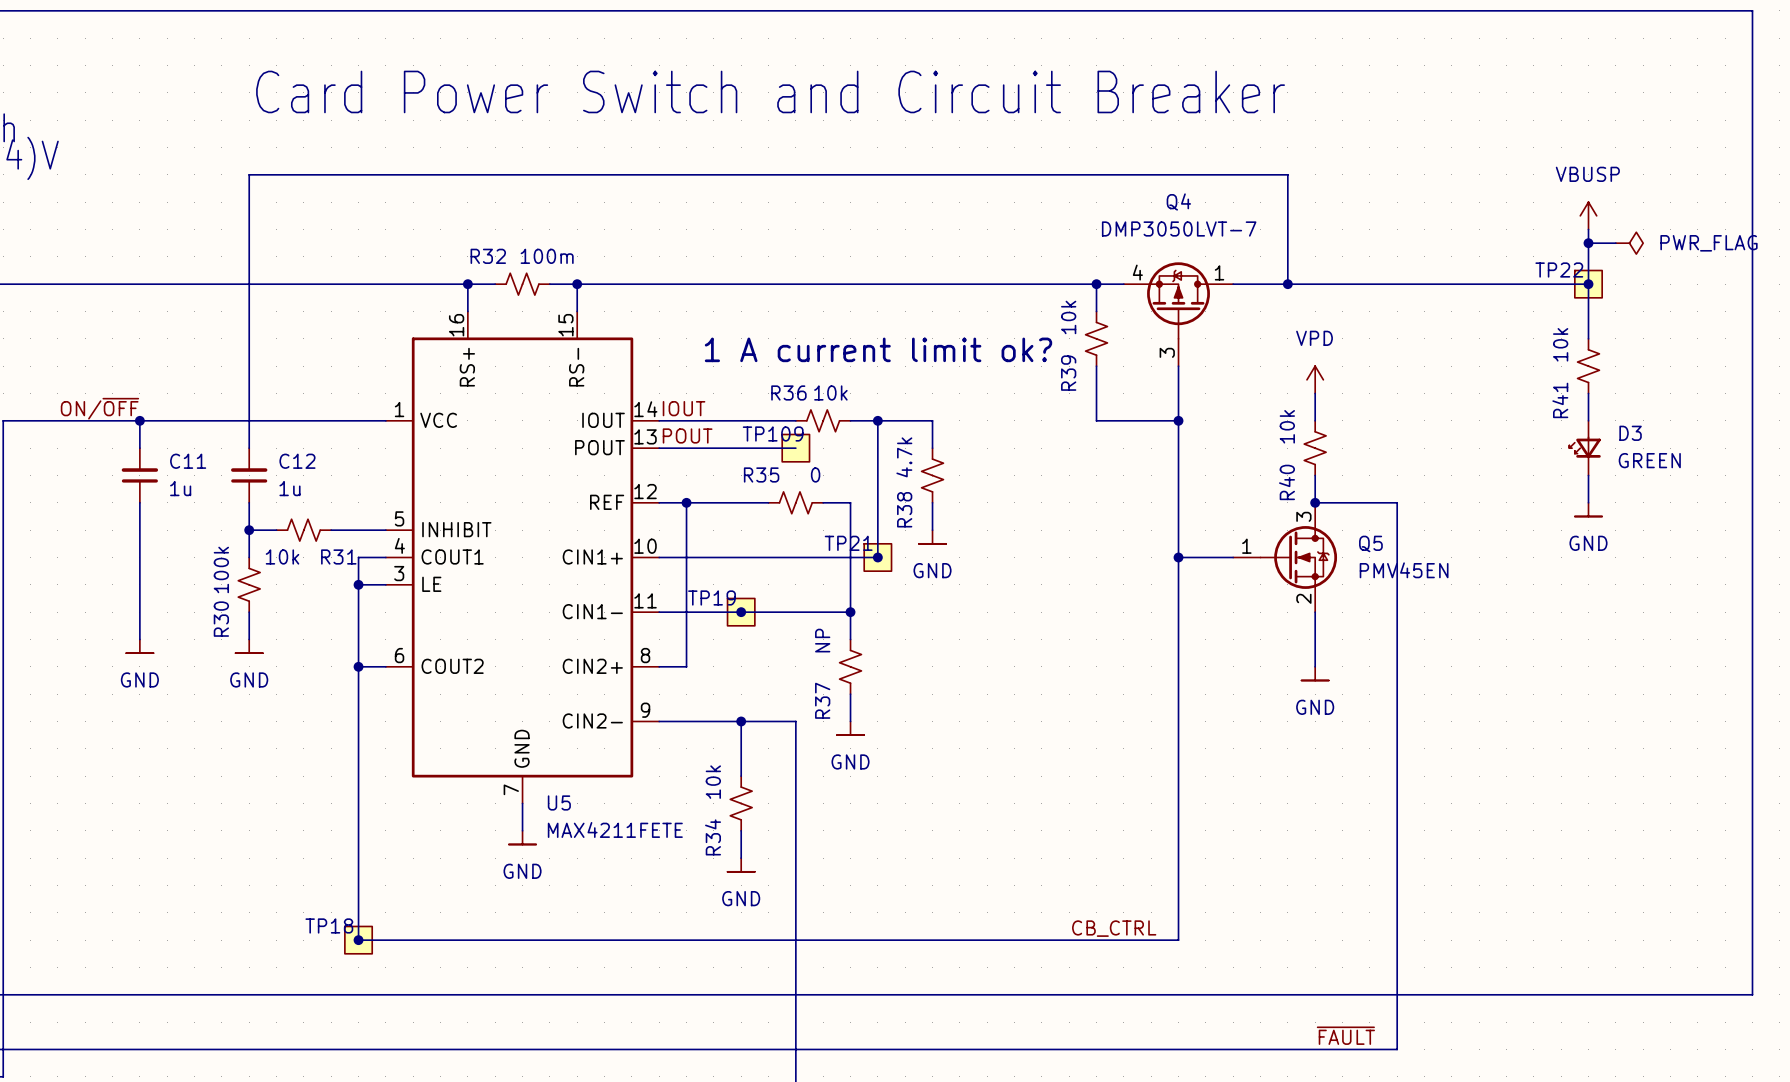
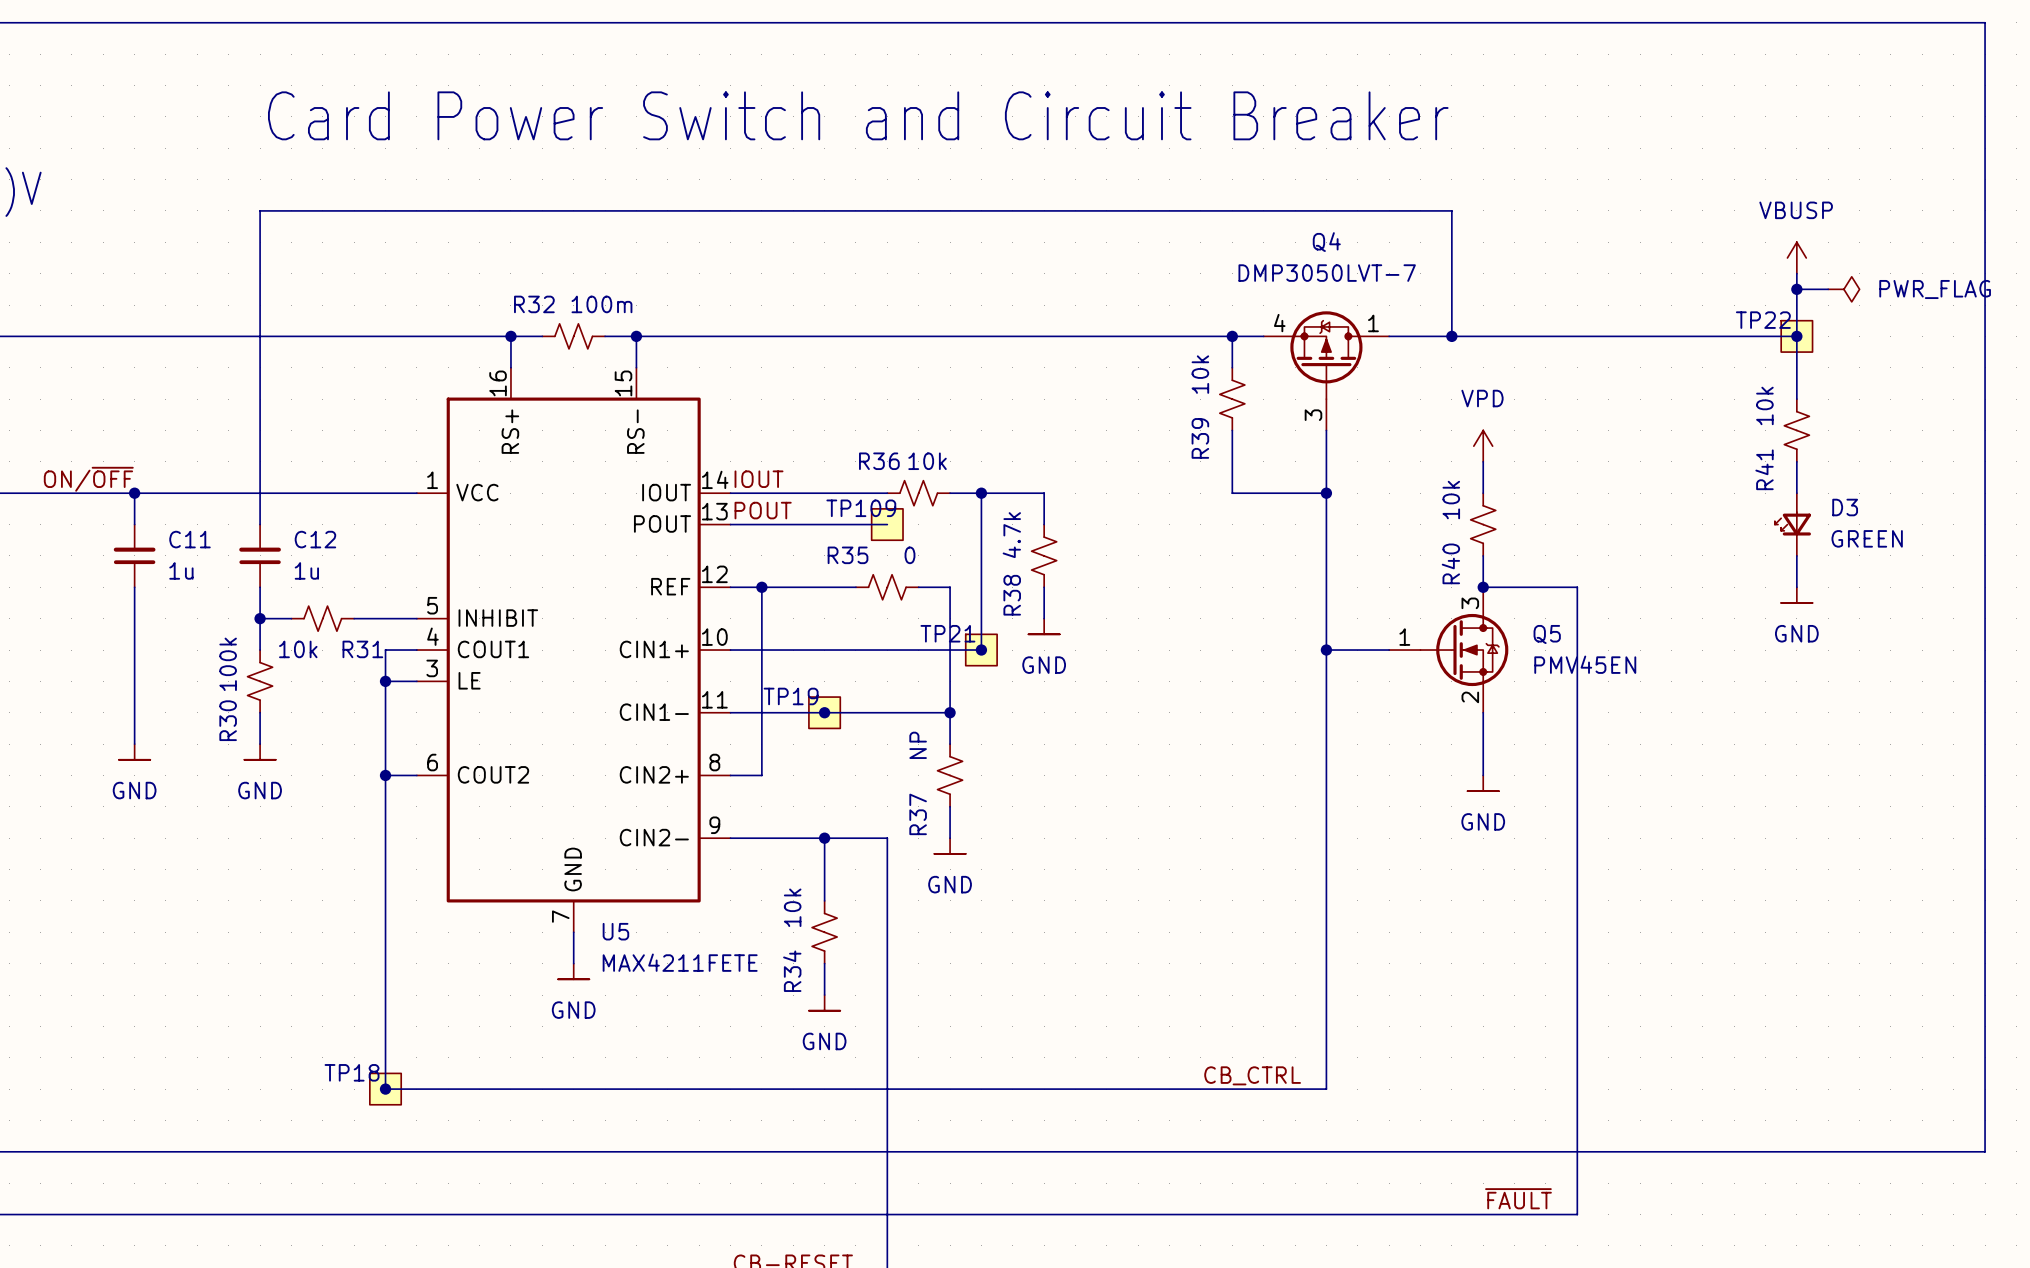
text: 1 A current limit ok? (878, 349) -> none

